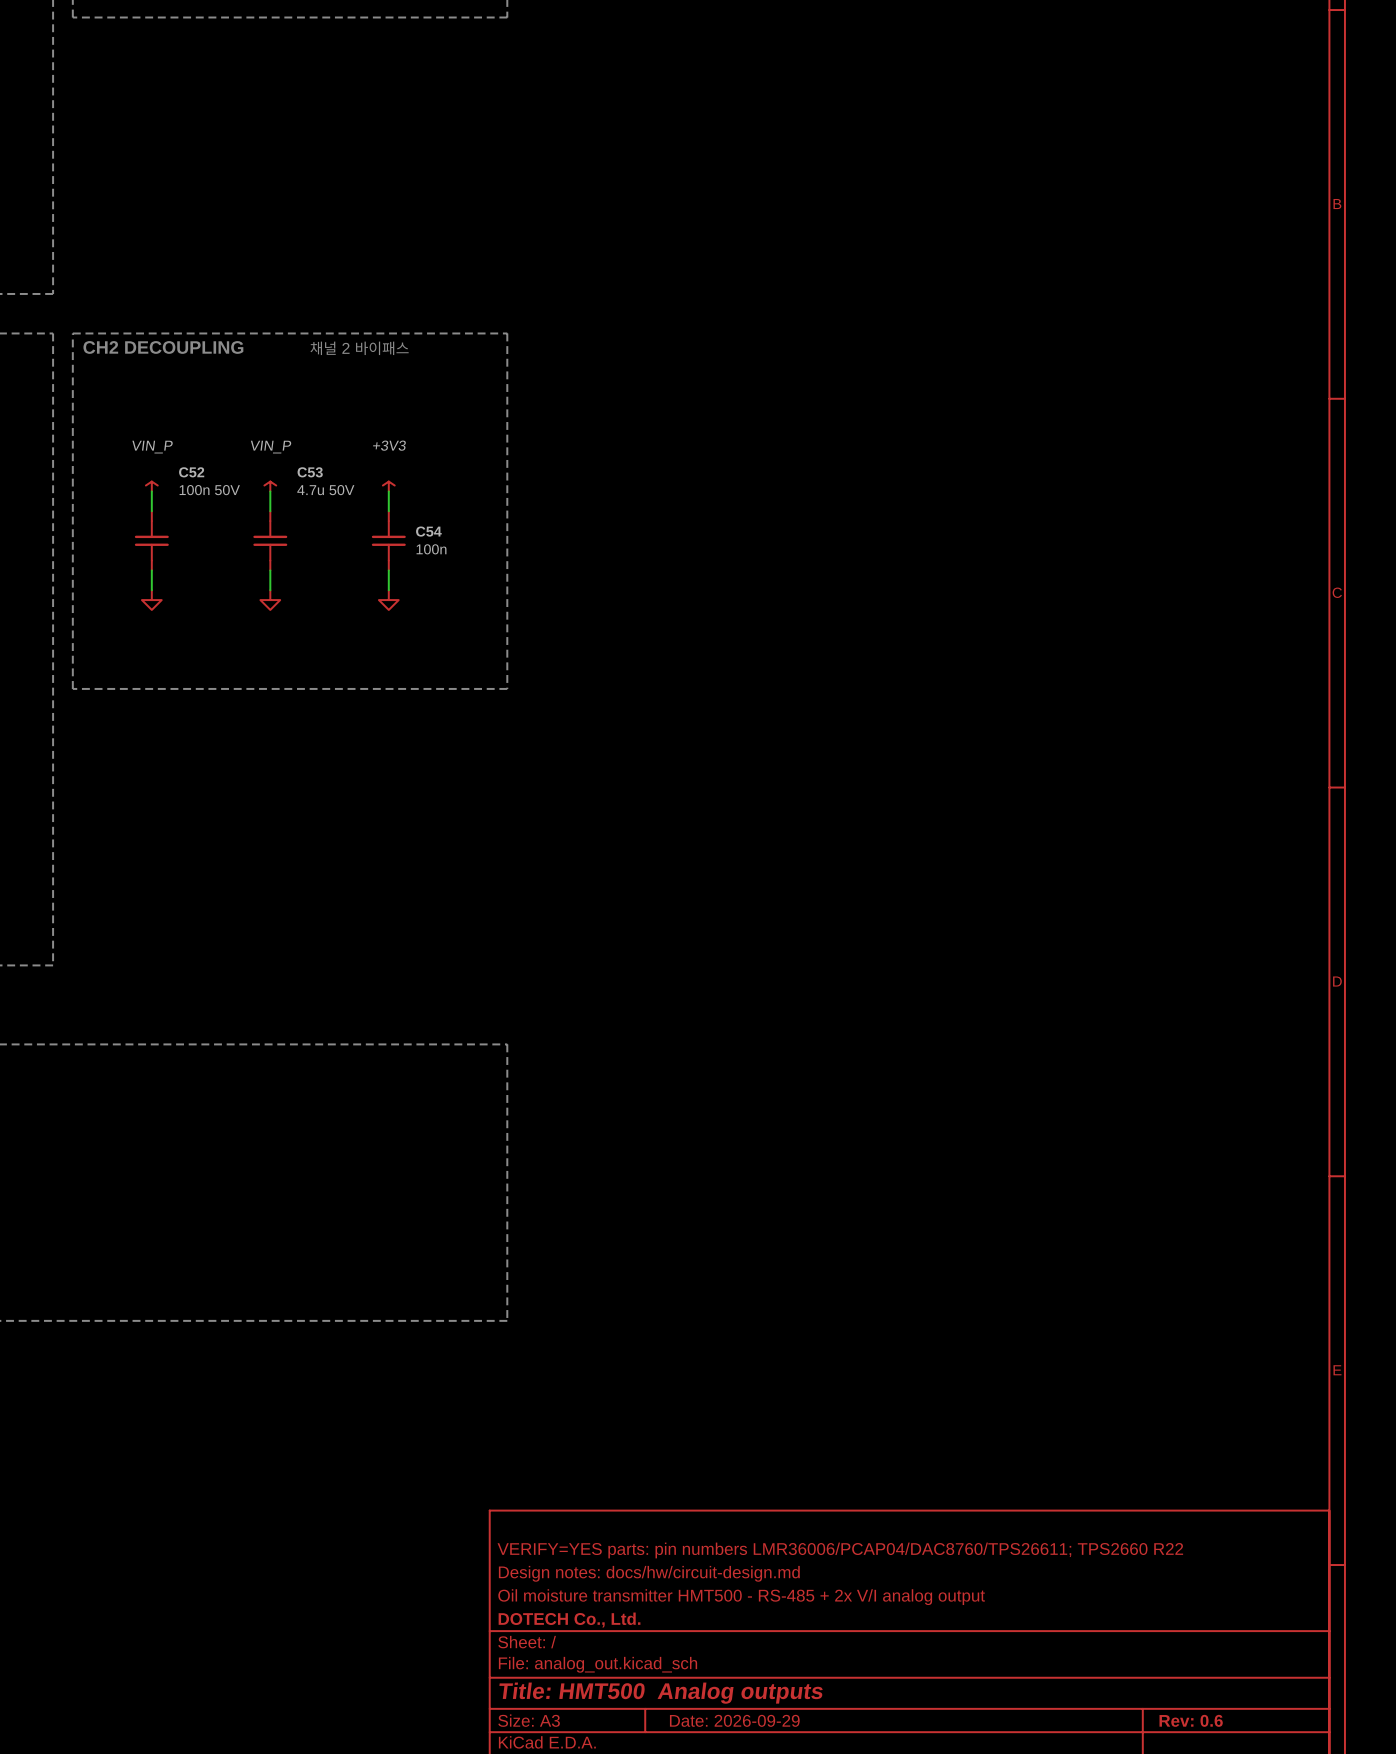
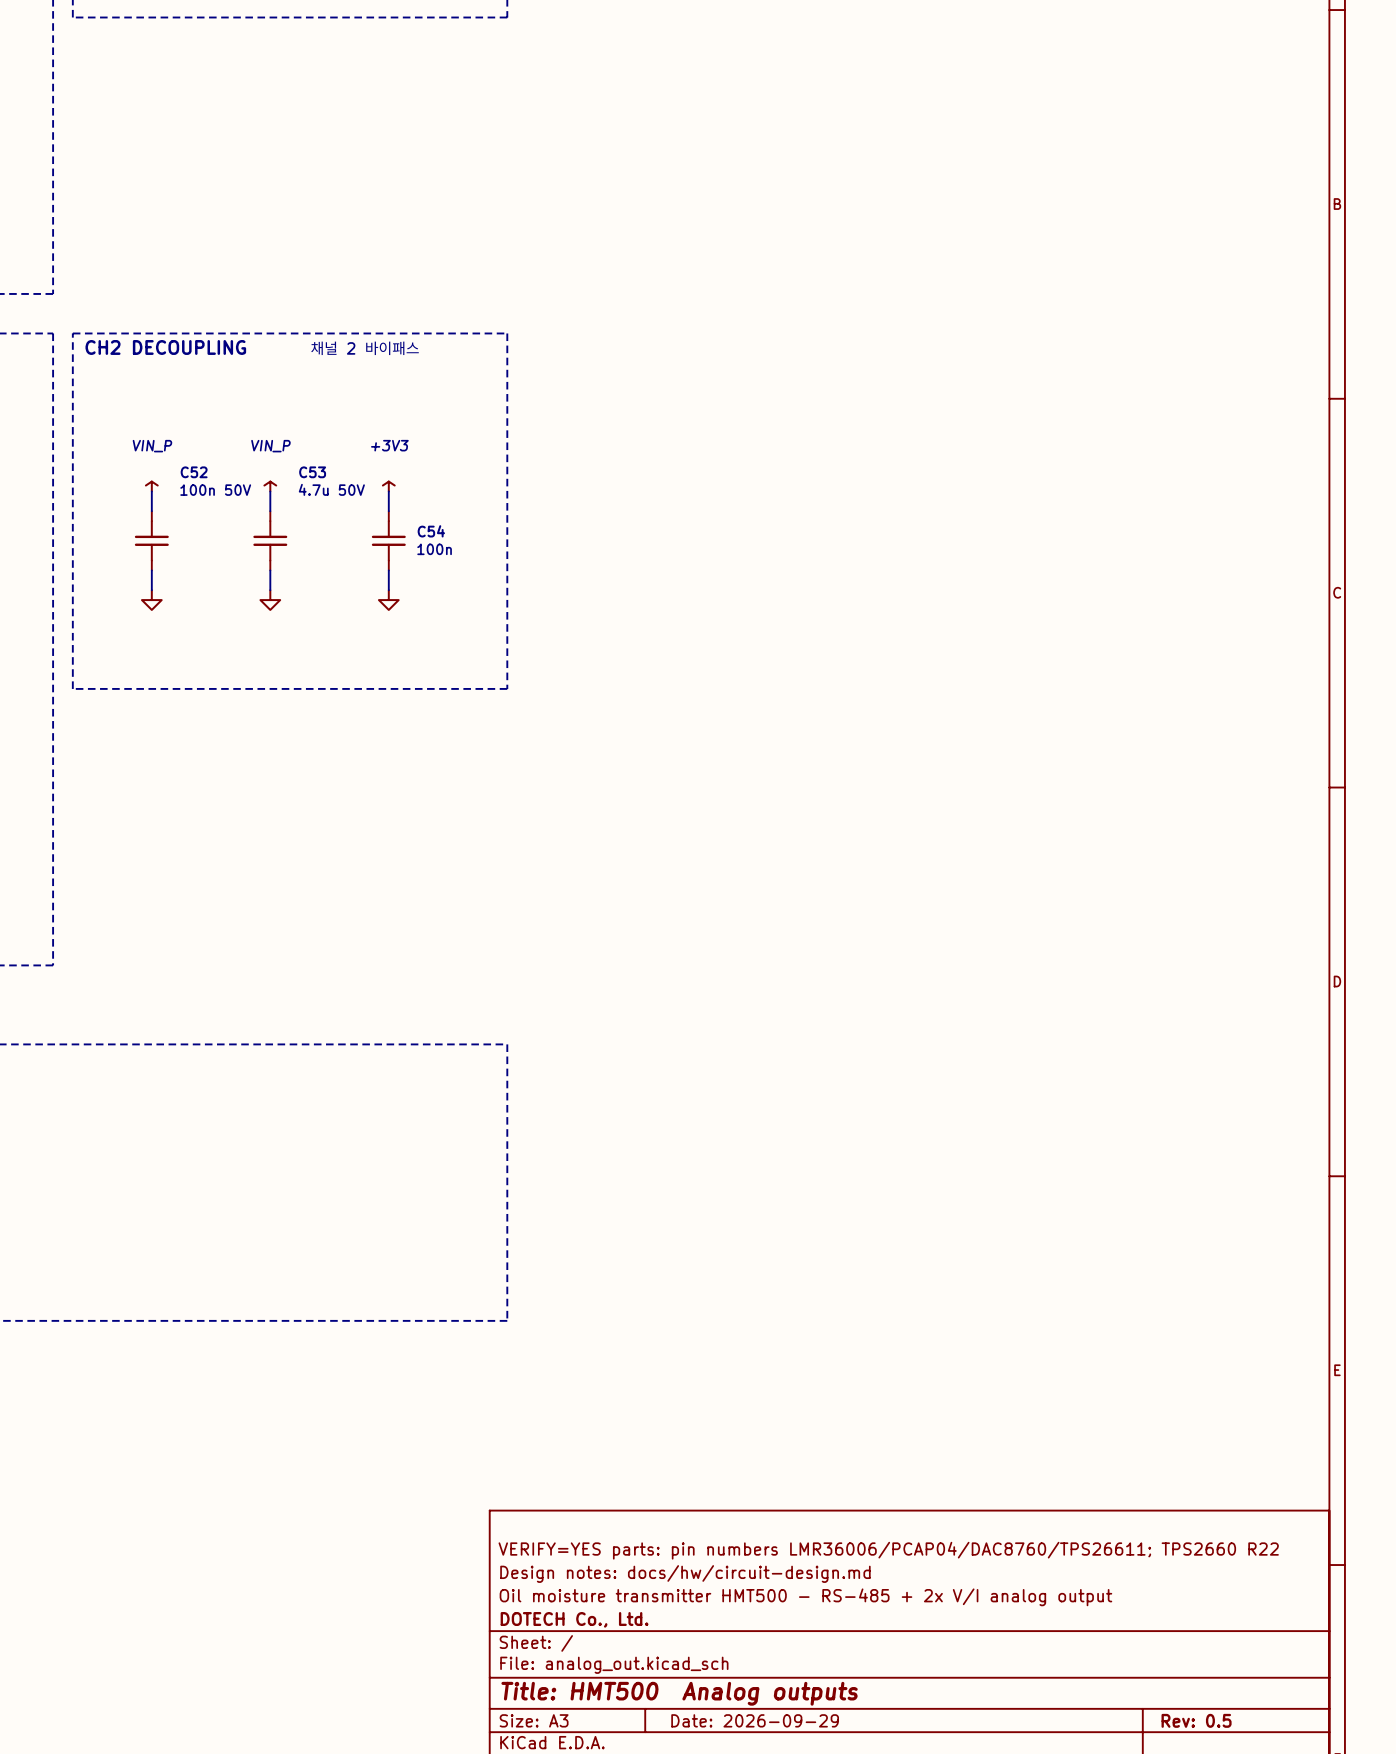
title block: Rev: 0.6 (1191, 1720) -> Rev: 0.5 (1196, 1720)

